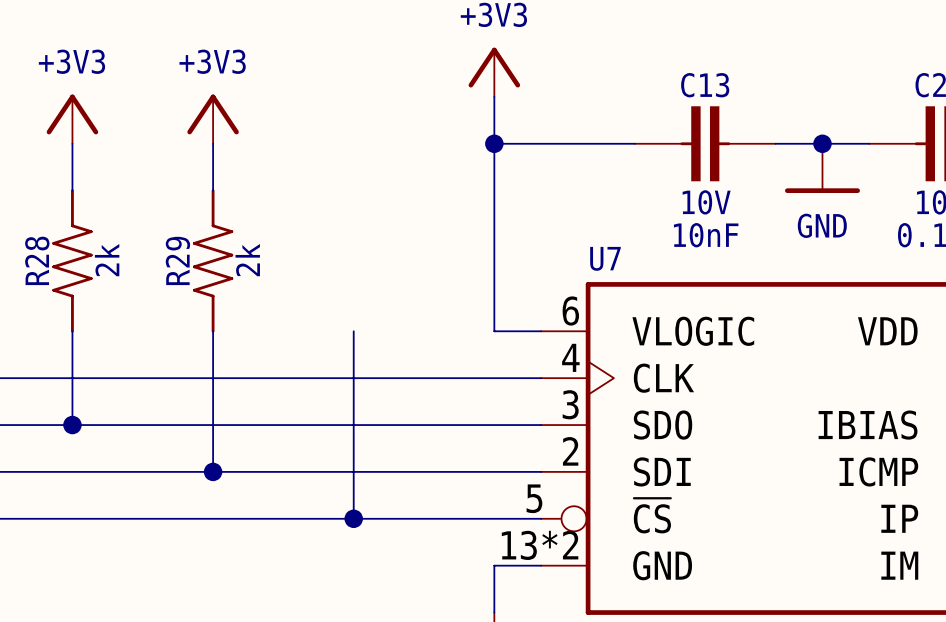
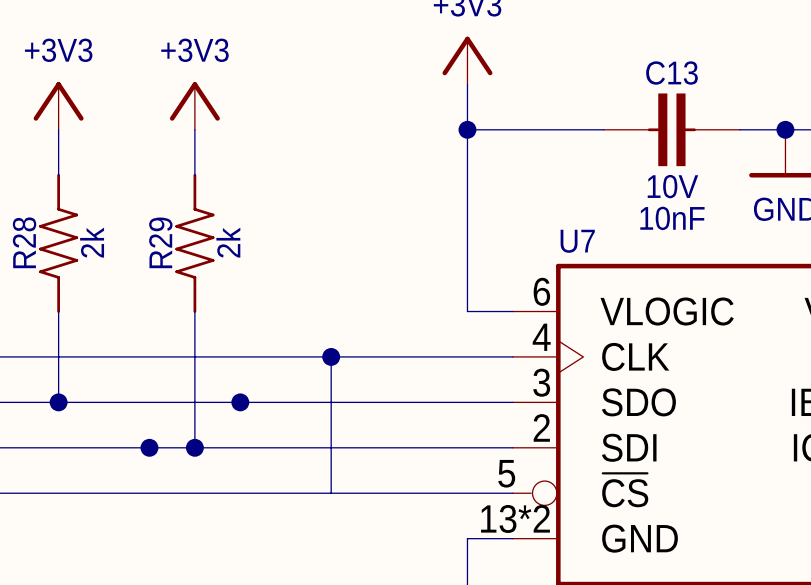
wire: (353, 331) (353, 378) -> none
junction: none -> (331, 356)
junction: none -> (240, 402)
junction: none -> (149, 447)
junction: (353, 518) -> none

